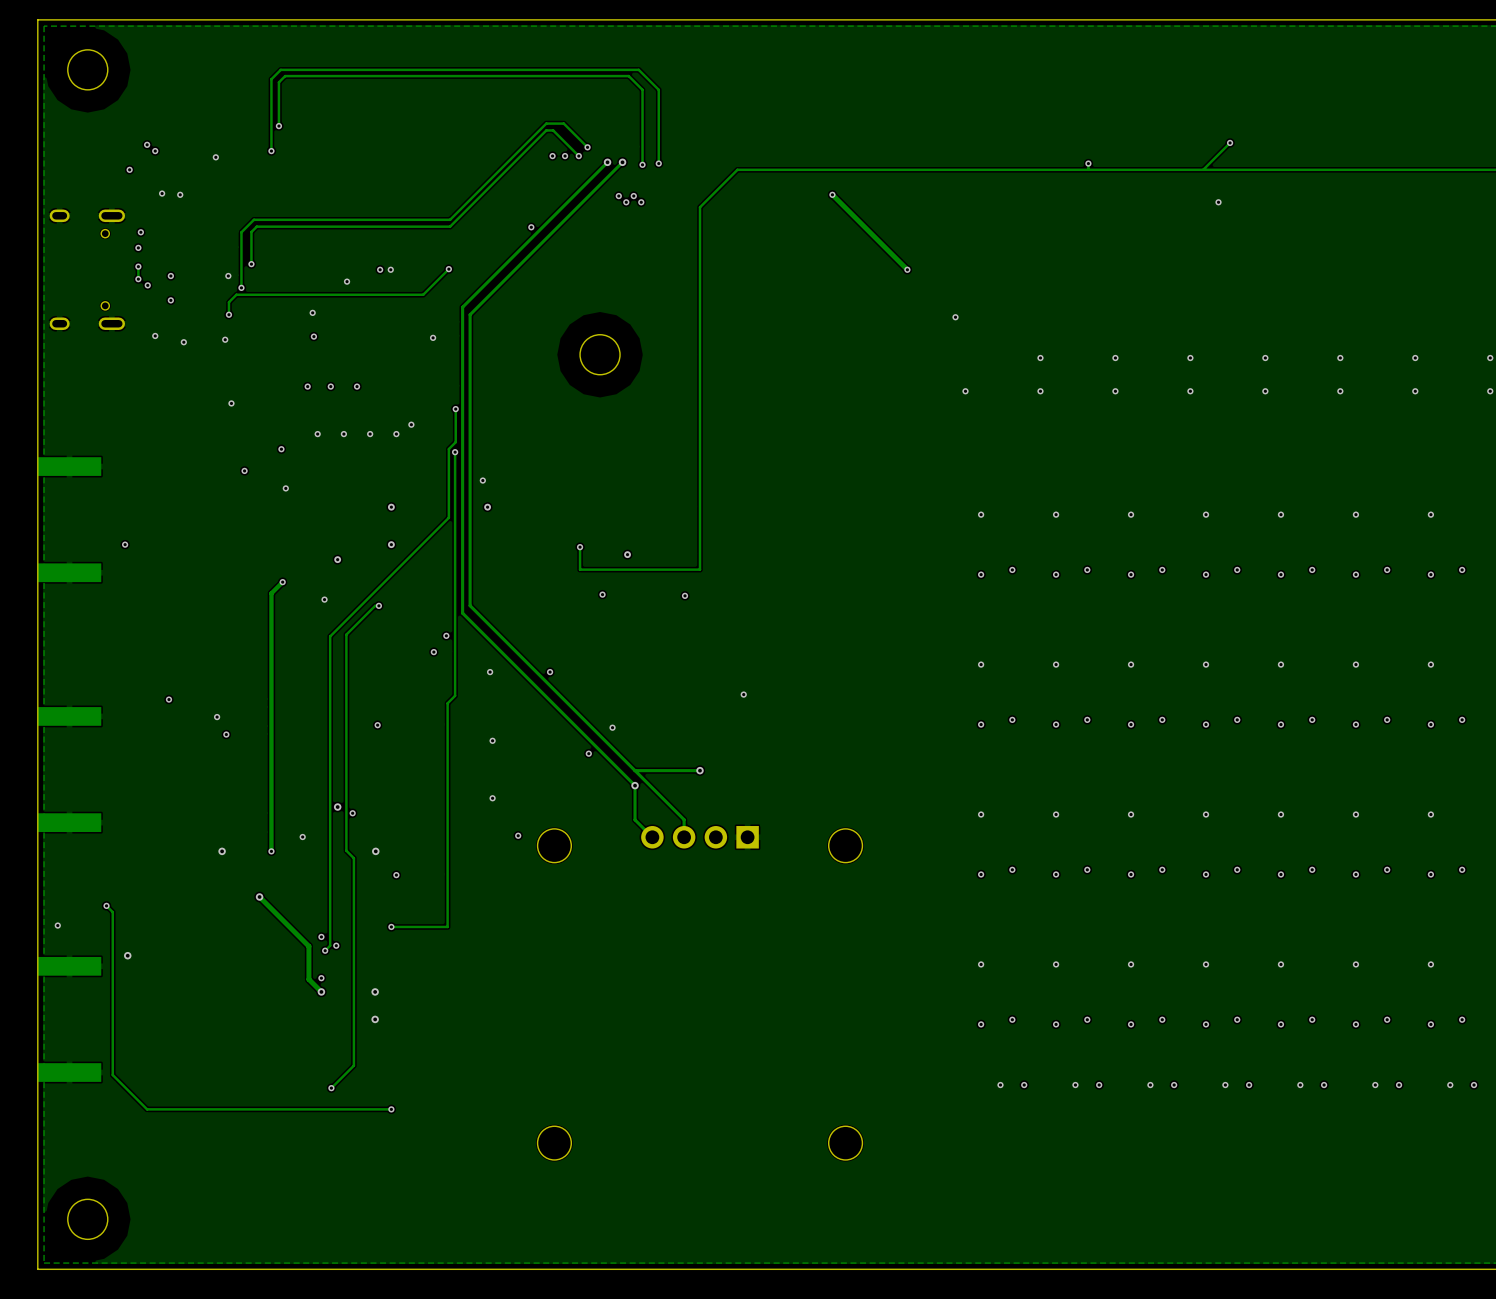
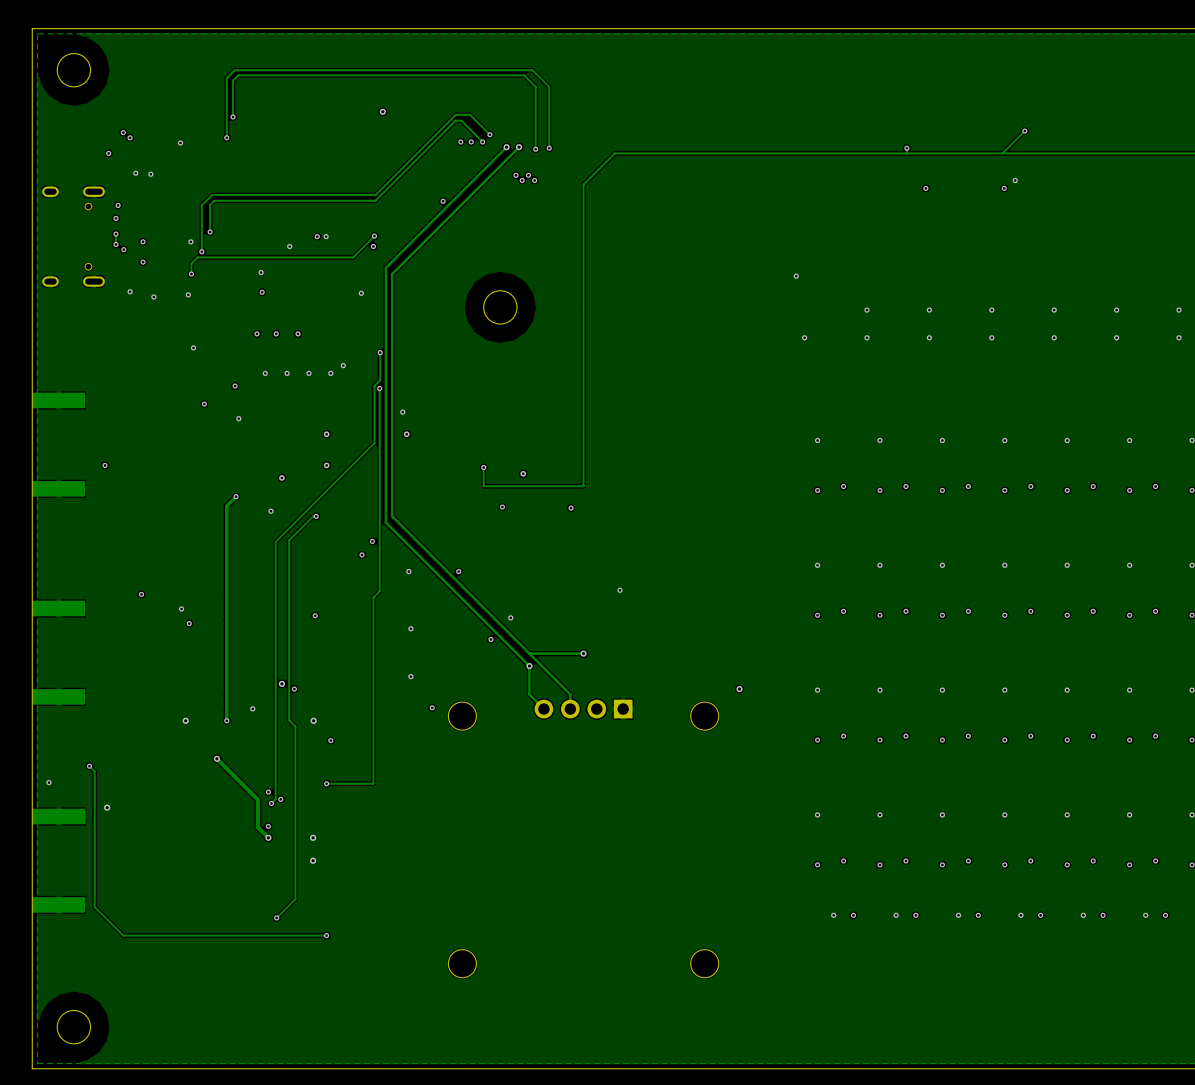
via: none -> (382, 111)
track: (832, 194) (907, 269) -> none
via: (832, 194) -> none
via: none -> (925, 188)
via: none -> (1004, 188)
via: (907, 269) -> none
via: none -> (373, 246)
via: none -> (739, 689)

